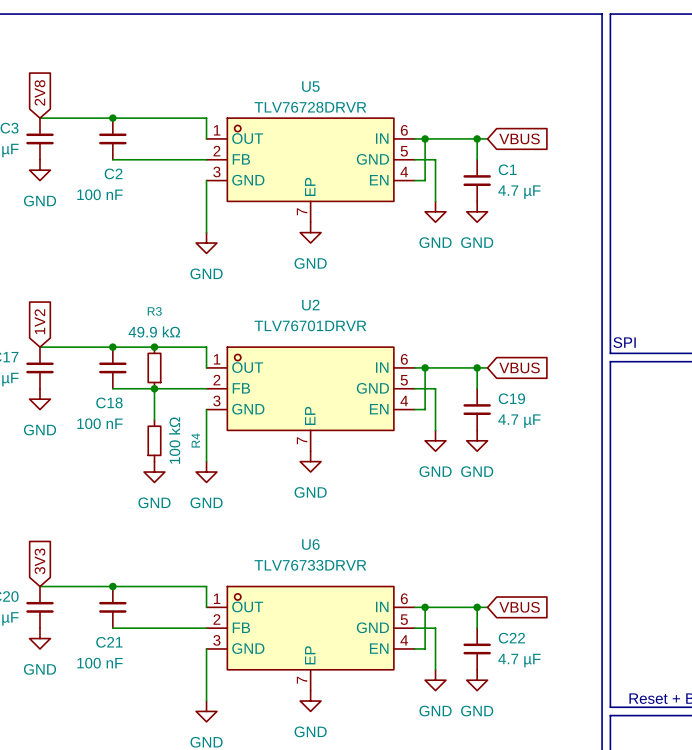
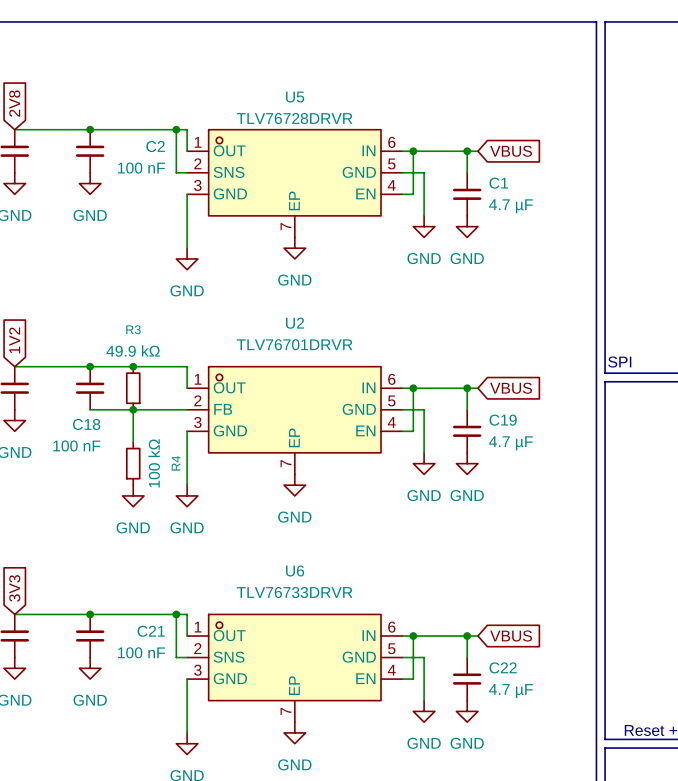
junction: none -> (176, 129)
wire: (112, 159) (196, 159) -> (176, 129) (176, 172)
U5 pin name: FB (241, 159) -> SNS (229, 172)
power symbol: none -> GND (90, 183)
C2 name position: C2 (113, 173) -> C2 (155, 146)
C2 value position: 100 nF (99, 194) -> 100 nF (141, 168)
junction: none -> (176, 614)
U6 pin name: FB (241, 627) -> SNS (229, 657)
wire: (112, 628) (196, 628) -> (176, 614) (176, 657)
power symbol: none -> GND (90, 668)
C21 name position: C21 (109, 642) -> C21 (151, 631)
C21 value position: 100 nF (99, 663) -> 100 nF (141, 652)

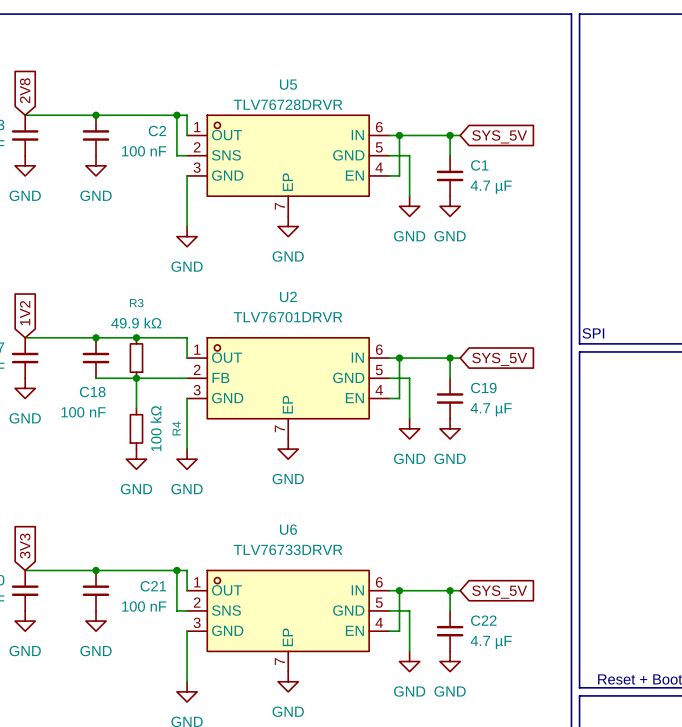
global label: VBUS (511, 151) -> SYS_5V (499, 136)
global label: VBUS (511, 388) -> SYS_5V (499, 359)
global label: VBUS (511, 635) -> SYS_5V (499, 592)

